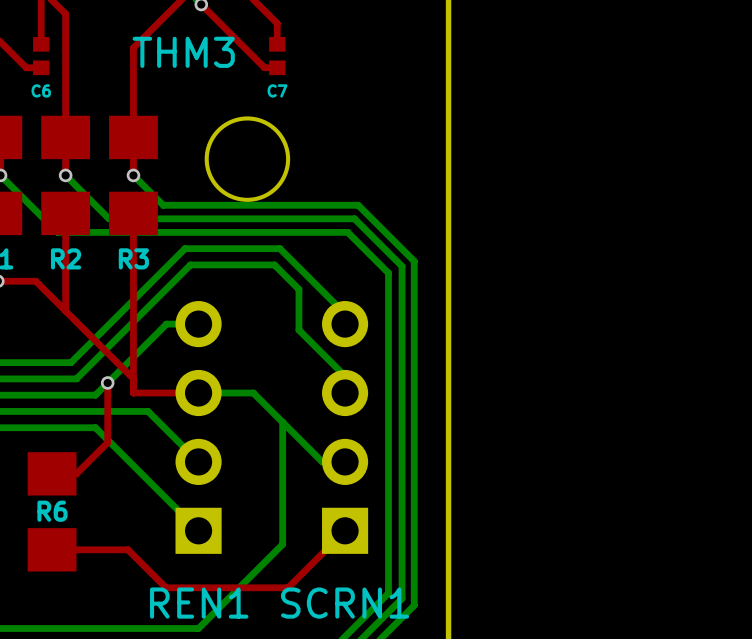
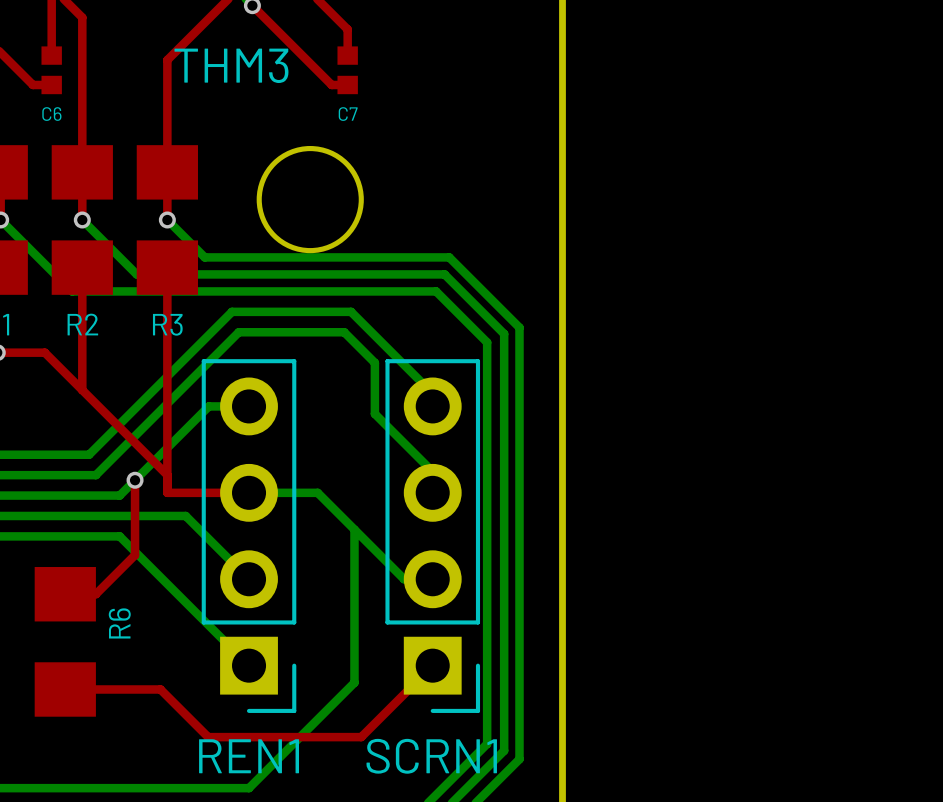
REN1 footprint: [175, 301, 222, 554] -> [201, 359, 297, 713]
SCRN1 footprint: [322, 301, 369, 554] -> [385, 359, 481, 713]
R6 name rotation: 0° (52, 511) -> 90° counterclockwise (119, 623)
R6 name position: R6 (52, 511) -> R6 (119, 623)

